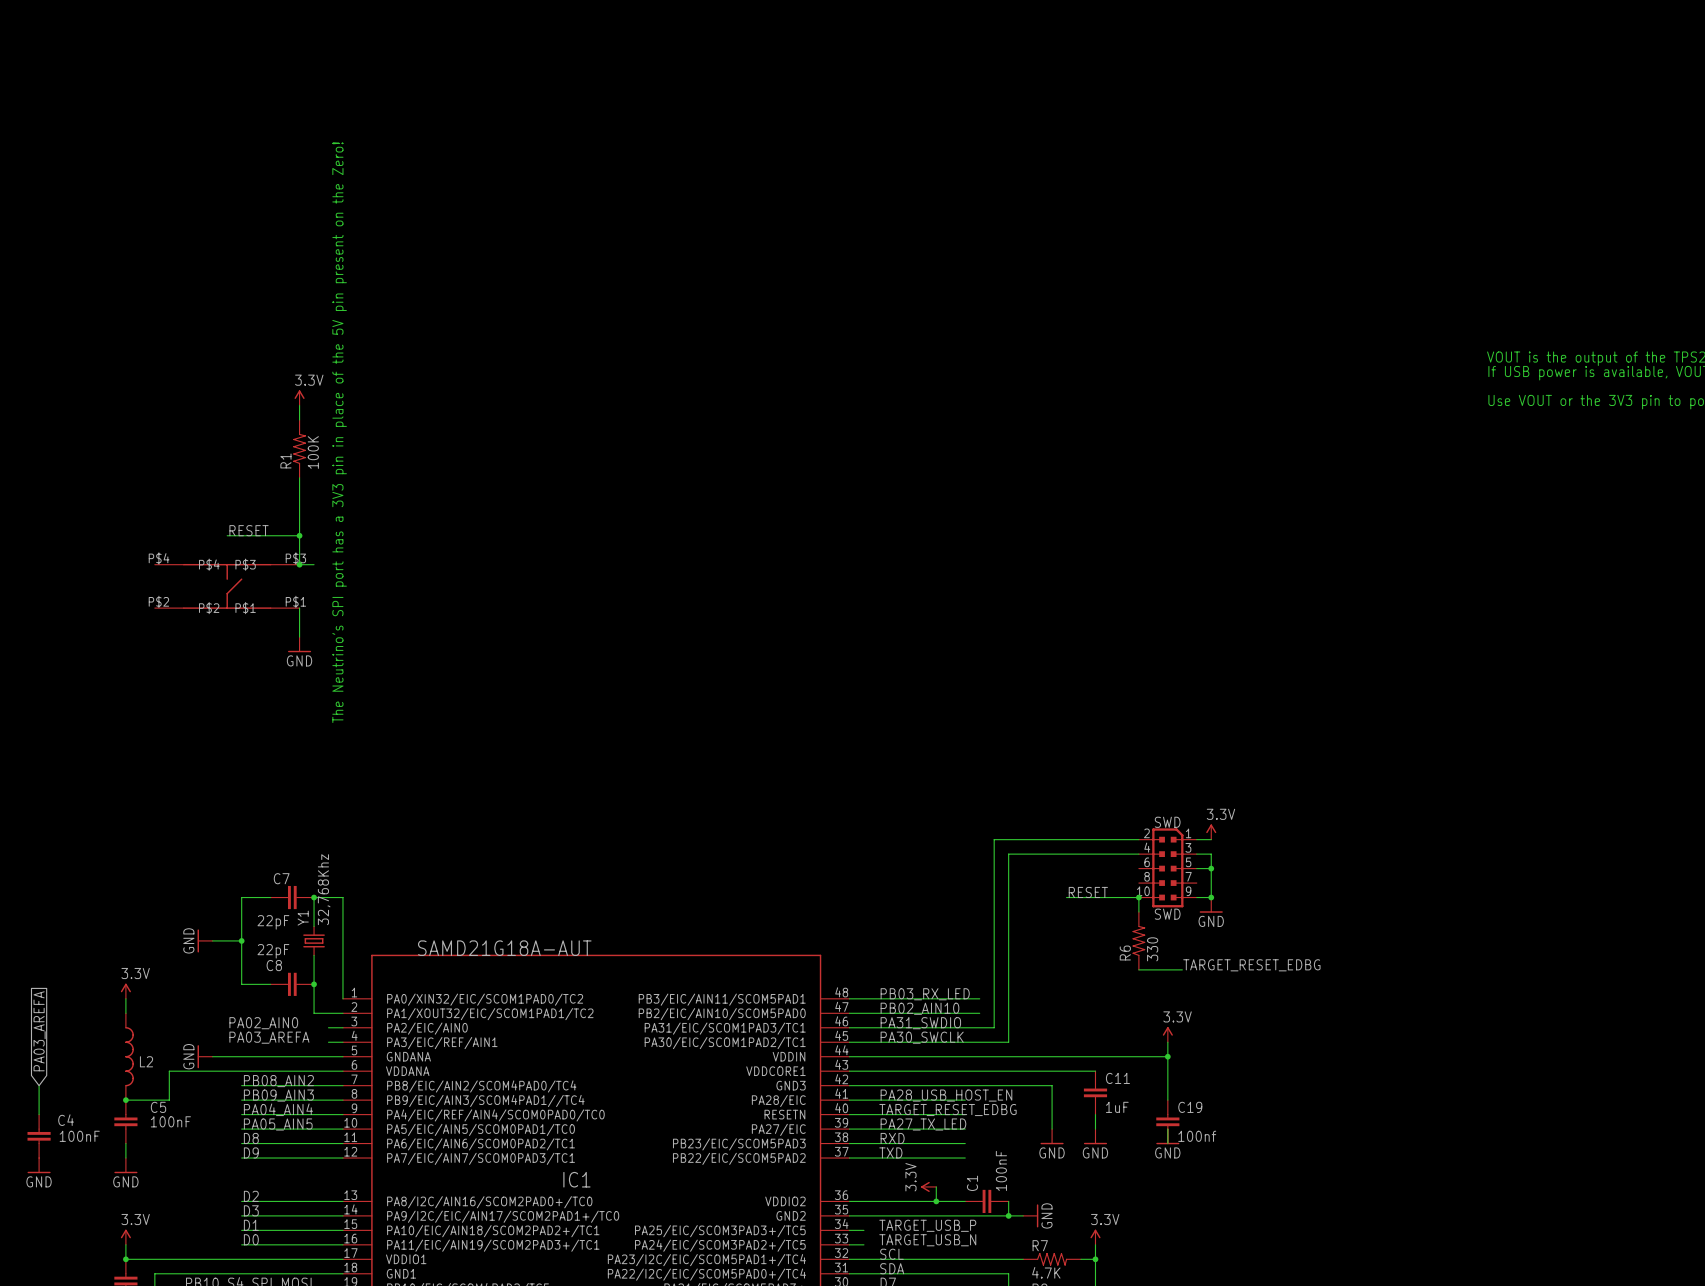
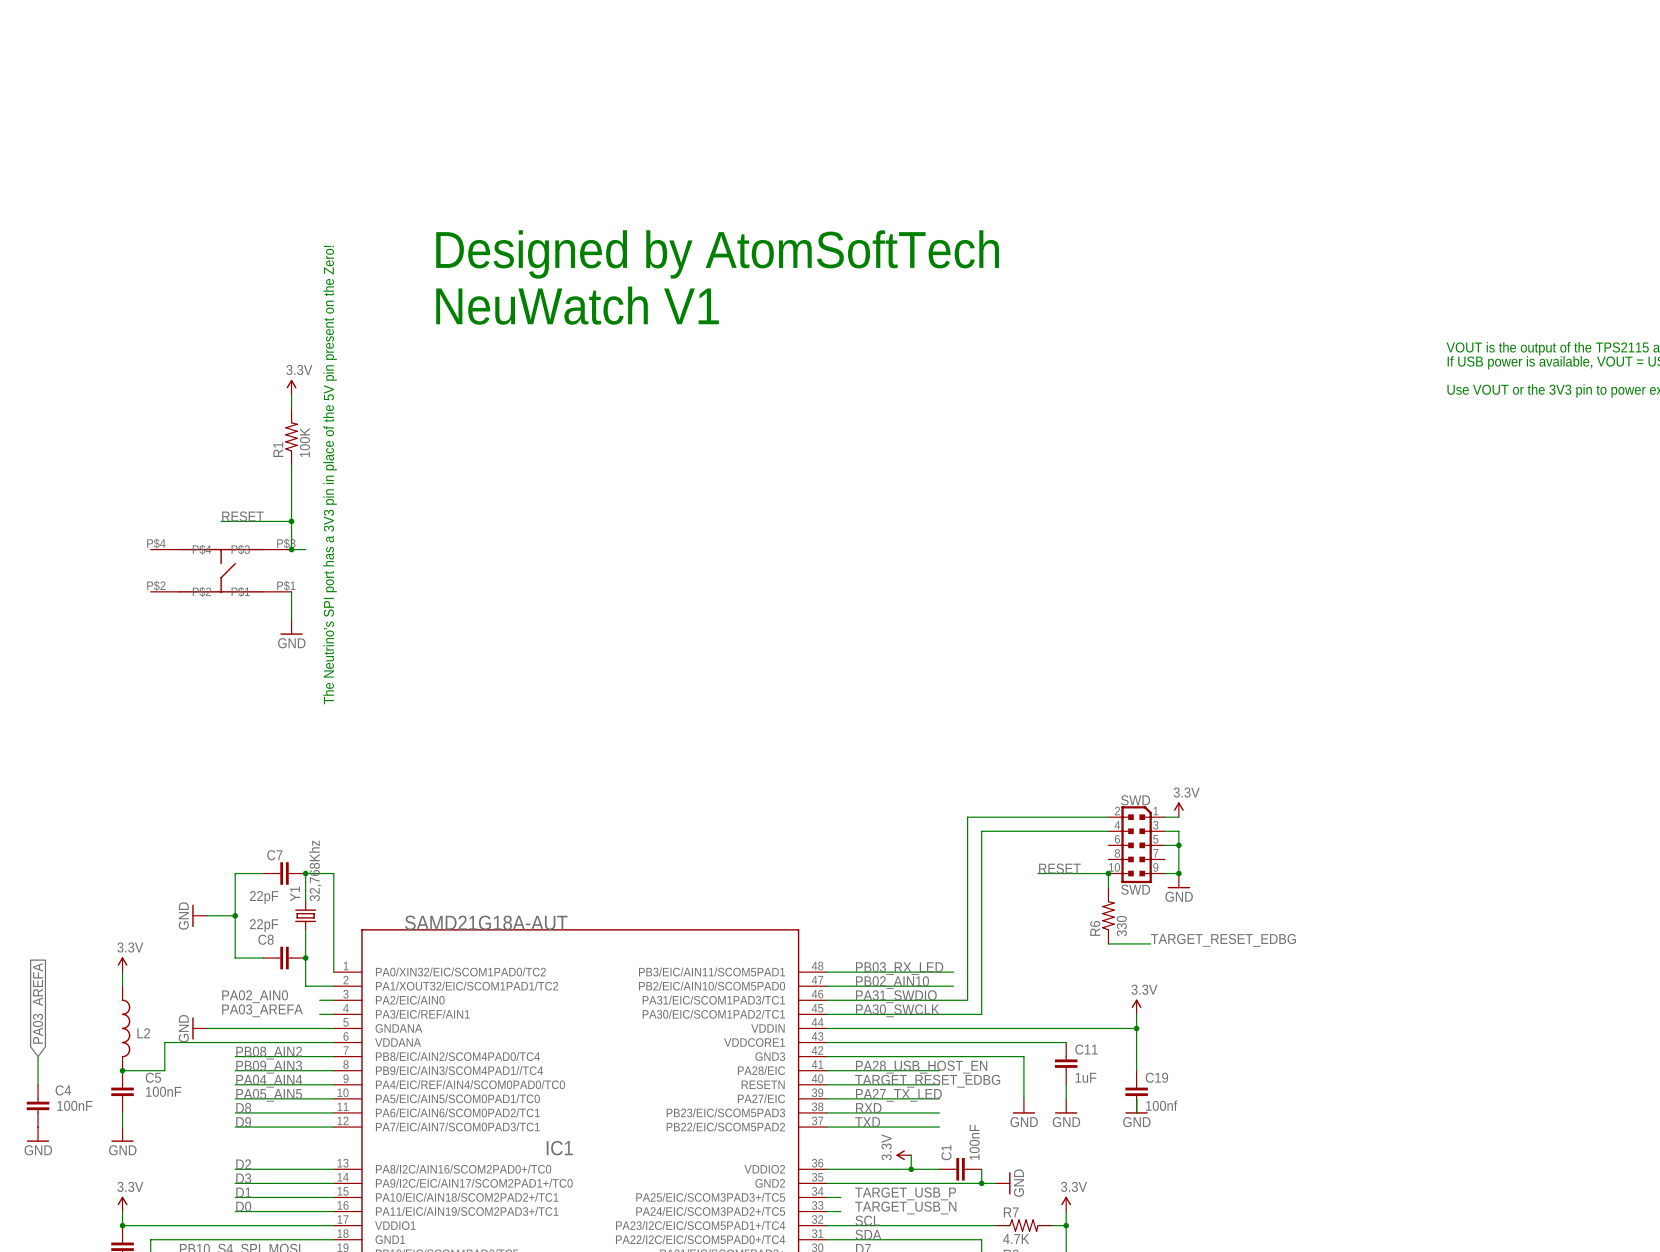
text: none -> Designed by AtomSoftTech (717, 254)
text: none -> NeuWatch V1 (577, 305)

